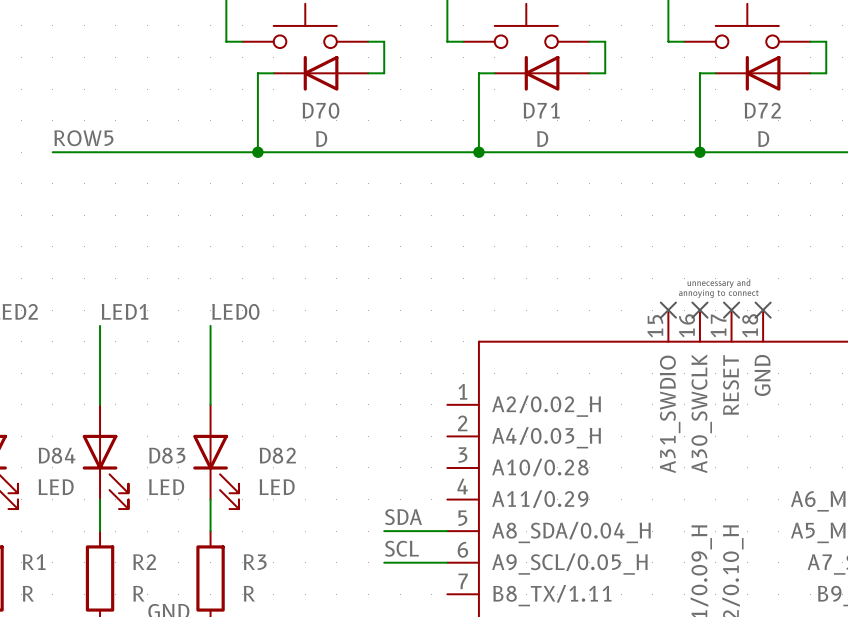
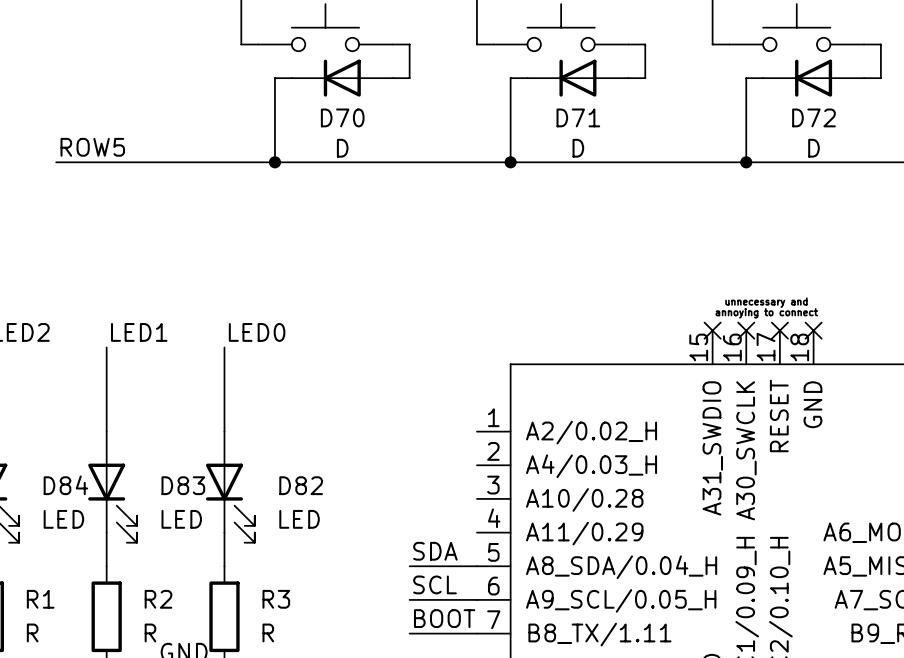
label: none -> BOOT (444, 618)
wire: none -> (409, 633) (476, 633)

